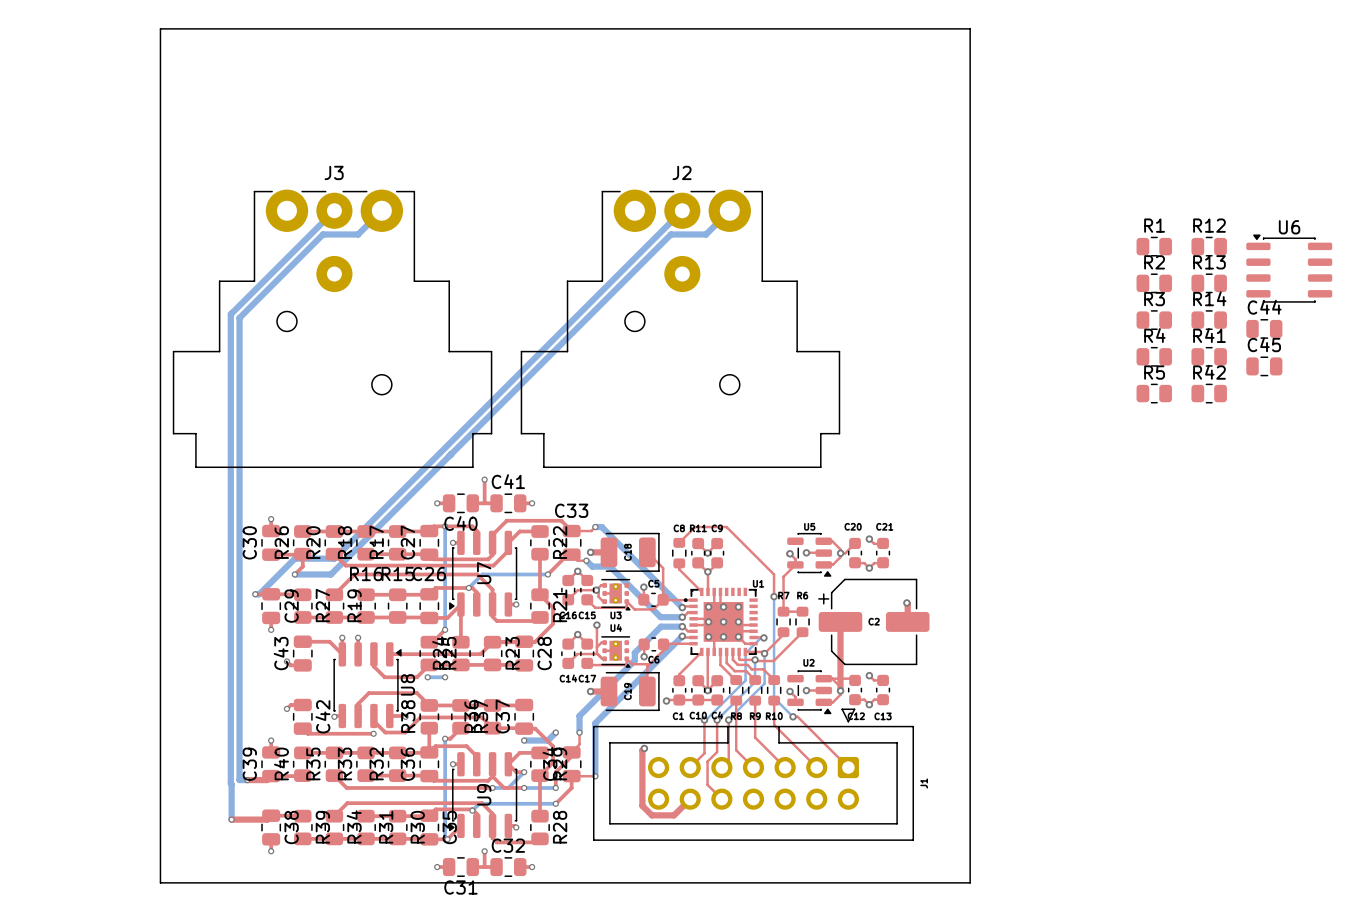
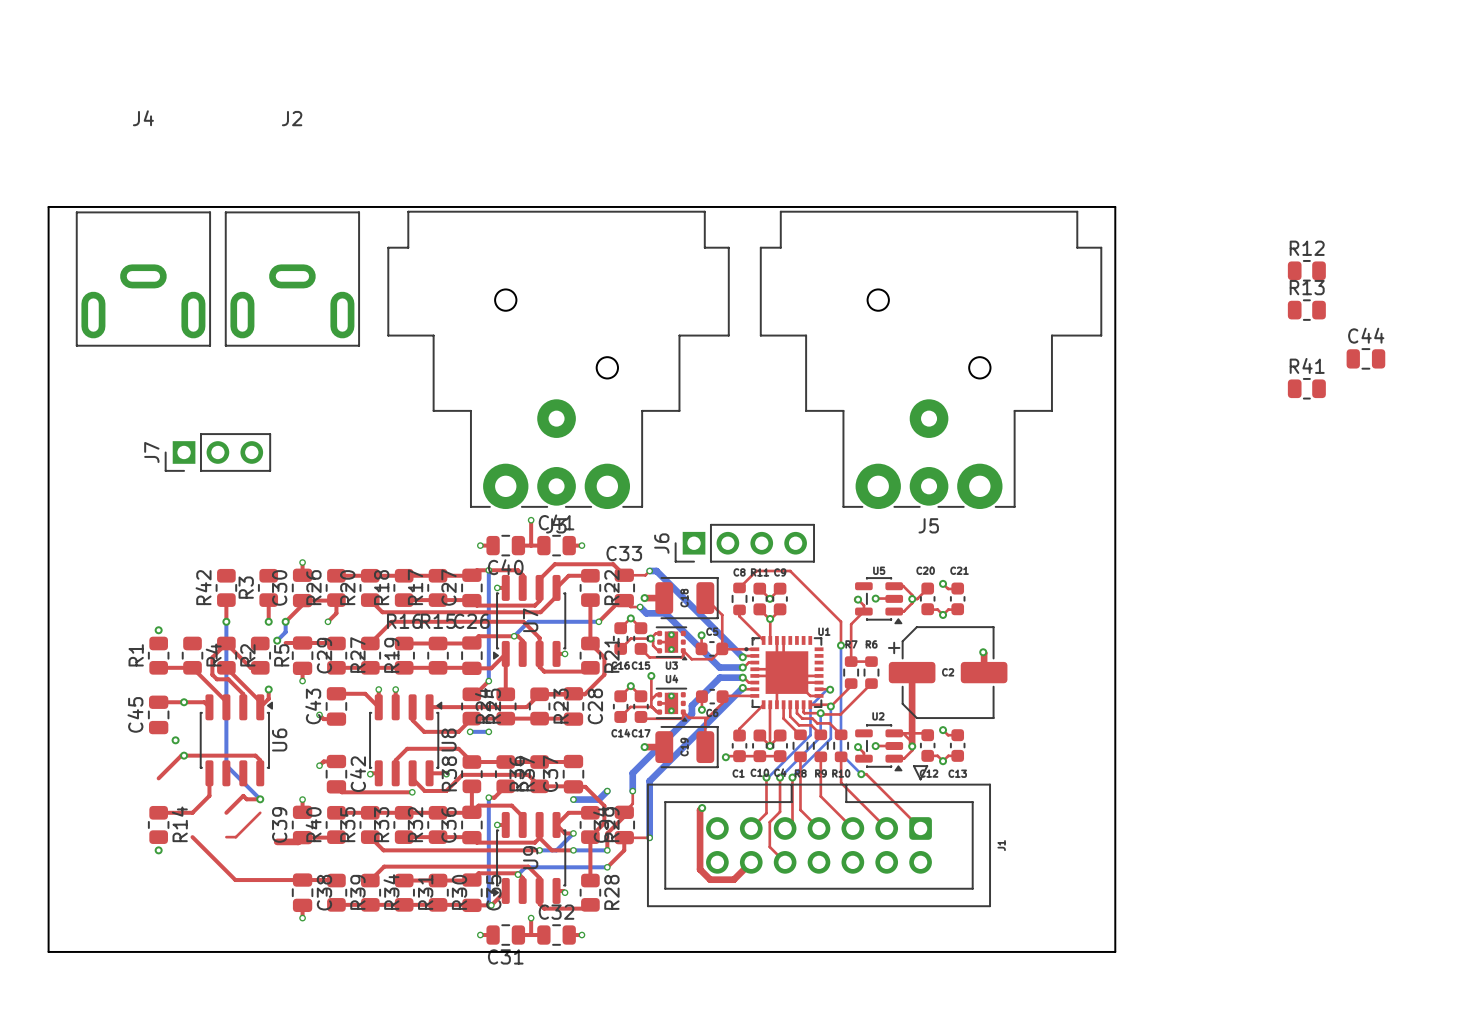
J2 footprint: [520, 189, 841, 469] -> [224, 211, 360, 347]
bottom track: (334, 210) (230, 314) (231, 819) -> none
bottom track: (381, 210) (358, 234) (323, 234) (239, 317) (239, 780) (247, 780) -> none
bottom track: (682, 210) (334, 558) (294, 558) (259, 594) (255, 594) -> none
bottom track: (729, 210) (706, 234) (670, 234) (330, 574) (294, 574) -> none
R1 name position: R1 (1154, 225) -> R1 (136, 655)
R1 rotation: 0° (1154, 246) -> 90° clockwise (158, 655)
R1 position: (1154, 246) -> (158, 655)
J4: none -> (143, 279)
U6 rotation: 0° (1289, 268) -> 90° clockwise (236, 740)
U6 position: (1289, 268) -> (236, 740)
R2 rotation: 0° (1154, 283) -> 90° clockwise (226, 655)
R2 position: (1154, 283) -> (226, 655)
R3 name position: R3 (1154, 299) -> R3 (246, 587)
R3 rotation: 0° (1154, 320) -> 90° clockwise (268, 587)
R3 position: (1154, 320) -> (268, 587)
R14 rotation: 0° (1209, 320) -> 90° clockwise (158, 824)
R14 position: (1209, 320) -> (158, 824)
J3 rotation: 0° (332, 328) -> 180° (558, 359)
J5: none -> (931, 359)
C45 name position: C45 (1264, 344) -> C45 (135, 714)
R4 rotation: 0° (1154, 356) -> 90° clockwise (192, 655)
R4 position: (1154, 356) -> (192, 655)
C45 rotation: 0° (1264, 366) -> 90° clockwise (158, 714)
C45 position: (1264, 366) -> (158, 714)
R42 name position: R42 (1209, 372) -> R42 (203, 587)
R5 rotation: 0° (1154, 393) -> 90° clockwise (260, 655)
R5 position: (1154, 393) -> (260, 655)
R42 rotation: 0° (1209, 393) -> 90° clockwise (226, 587)
R42 position: (1209, 393) -> (226, 587)
J7: none -> (217, 452)
J6: none -> (744, 543)
top track: none -> (226, 600) (226, 621)
top track: none -> (268, 600) (268, 621)
top track: none -> (302, 600) (302, 604) (285, 621)
bottom track: none -> (226, 621) (226, 765) (260, 799)
via: none -> (226, 621)
via: none -> (268, 621)
bottom track: none -> (285, 621) (285, 632) (277, 640)
via: none -> (285, 621)
via: none -> (158, 630)
via: none -> (277, 640)
via: (255, 594) -> none
via: (708, 606) -> none
via: (723, 606) -> none
via: (738, 606) -> none
top track: none -> (158, 667) (192, 667) (226, 701) (226, 707)
top track: none -> (226, 667) (260, 701) (260, 707) (268, 698) (268, 689)
top track: none -> (260, 667) (250, 667) (226, 643) (212, 657) (212, 674) (216, 679) (228, 679) (243, 694) (243, 707)
via: (708, 621) -> none
via: (723, 621) -> none
via: (738, 621) -> none
via: (708, 636) -> none
via: (723, 636) -> none
via: (738, 636) -> none
via: none -> (268, 689)
top track: none -> (158, 702) (204, 702) (209, 707)
via: none -> (184, 702)
via: none -> (175, 740)
via: none -> (184, 755)
top track: none -> (209, 773) (209, 795) (192, 812) (158, 812)
top track: none -> (260, 773) (260, 760) (255, 755) (181, 755) (158, 778)
top track: none -> (260, 799) (246, 799) (243, 795) (226, 812)
via: none -> (260, 799)
top track: none -> (260, 812) (235, 837) (226, 837)
via: (247, 780) -> none
via: none -> (158, 850)
top track: (271, 815) (267, 819) (231, 819) -> (302, 880) (235, 880) (192, 837)
via: (231, 819) -> none
board edge: (160, 882) (160, 28) (970, 28) (970, 882) -> (184, 951) (48, 951) (48, 206) (1115, 206) (1115, 951) (1050, 951)

